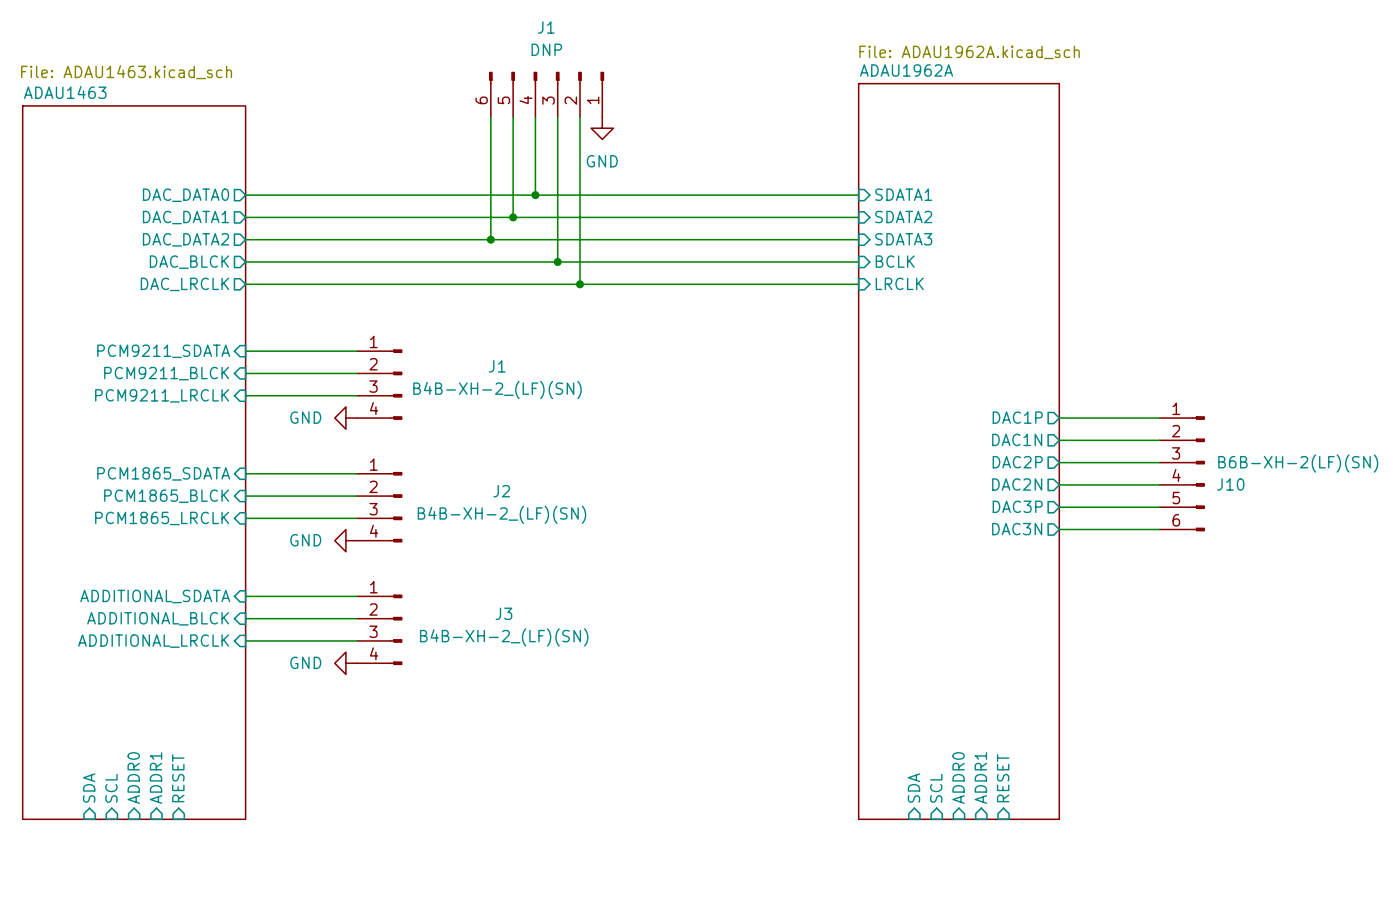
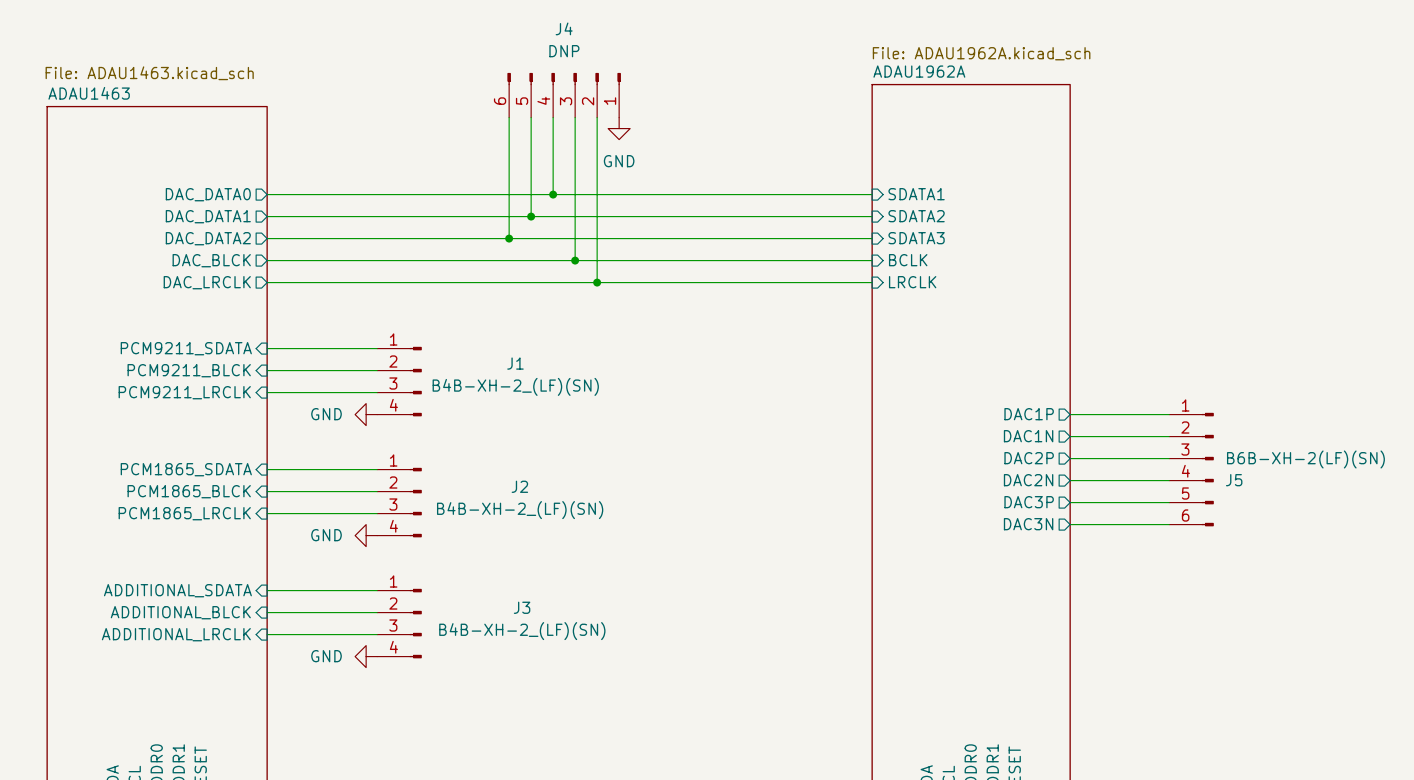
J1 name: J1 (546, 27) -> J4 (564, 28)
J10 name: J10 (1230, 484) -> J5 (1234, 480)

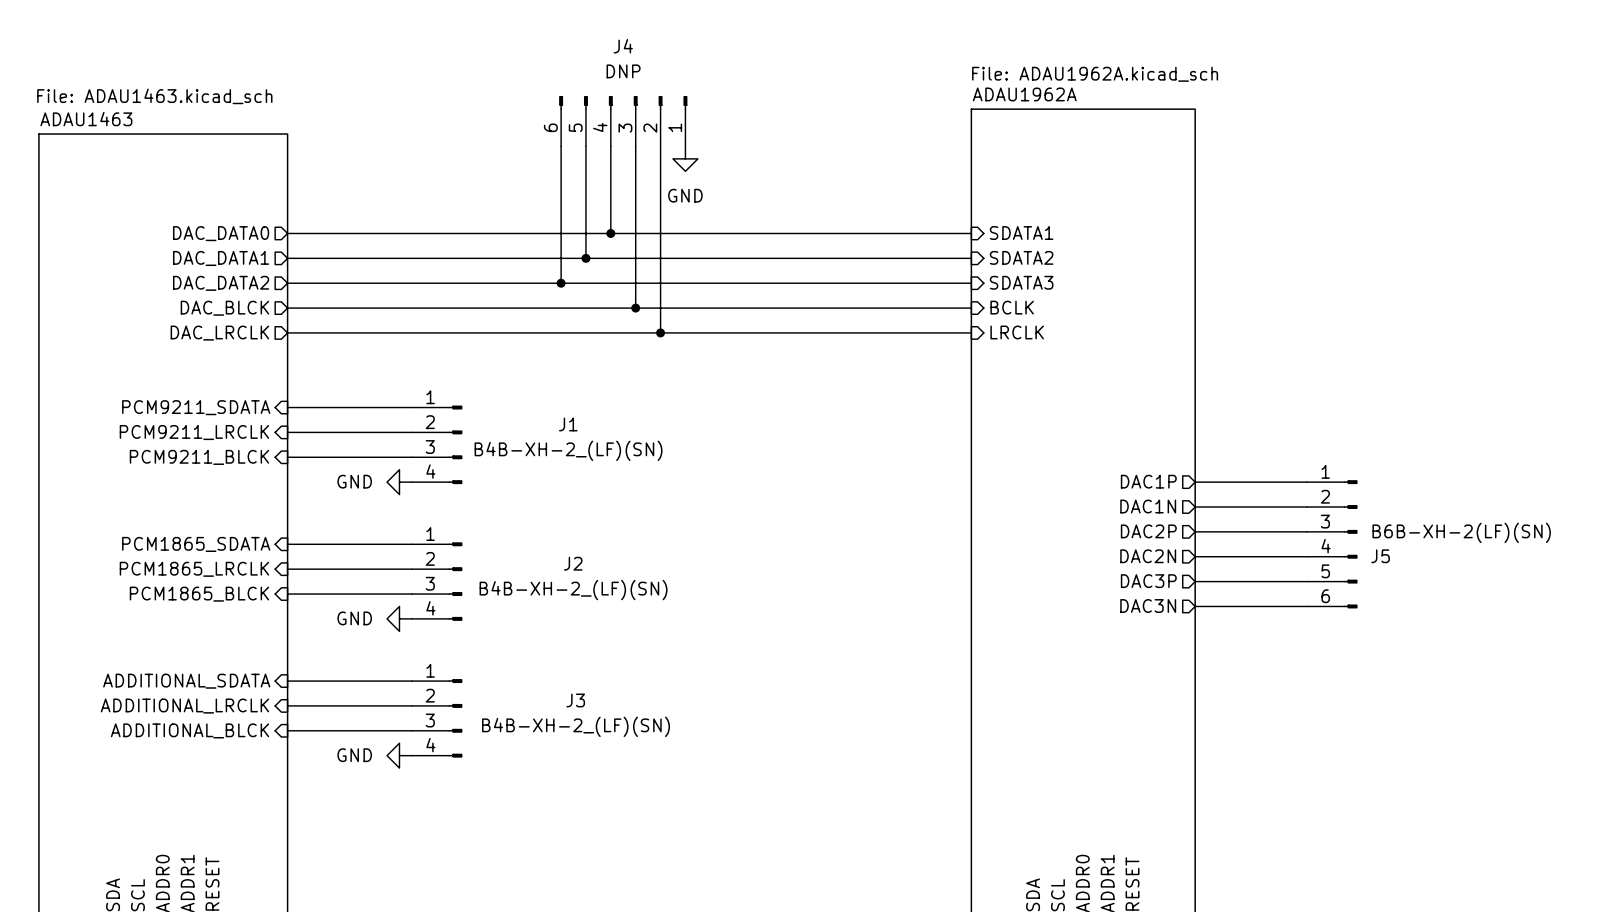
sheet pin: PCM9211_BLCK (189, 370) -> PCM9211_LRCLK (194, 432)
sheet pin: PCM9211_LRCLK (184, 392) -> PCM9211_BLCK (199, 457)
sheet pin: PCM1865_BLCK (189, 491) -> PCM1865_LRCLK (194, 569)
sheet pin: PCM1865_LRCLK (184, 513) -> PCM1865_BLCK (199, 594)
sheet pin: ADDITIONAL_BLCK (180, 612) -> ADDITIONAL_LRCLK (184, 706)
sheet pin: ADDITIONAL_LRCLK (176, 634) -> ADDITIONAL_BLCK (190, 730)

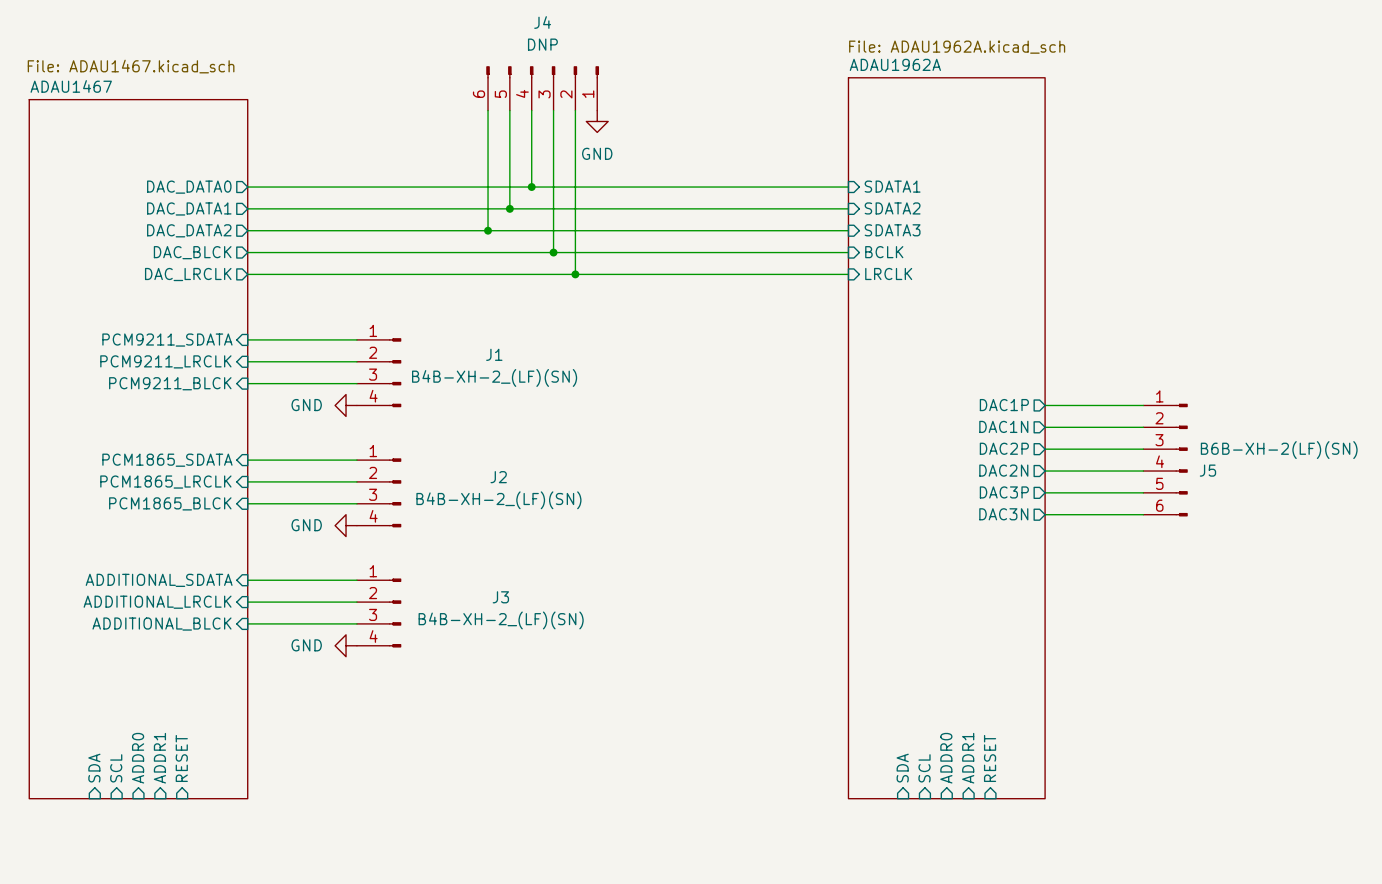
sheet ADAU1463 value: File: ADAU1463.kicad_sch (154, 96) -> File: ADAU1467.kicad_sch (131, 66)
sheet ADAU1463 name: ADAU1463 (86, 119) -> ADAU1467 (71, 86)

